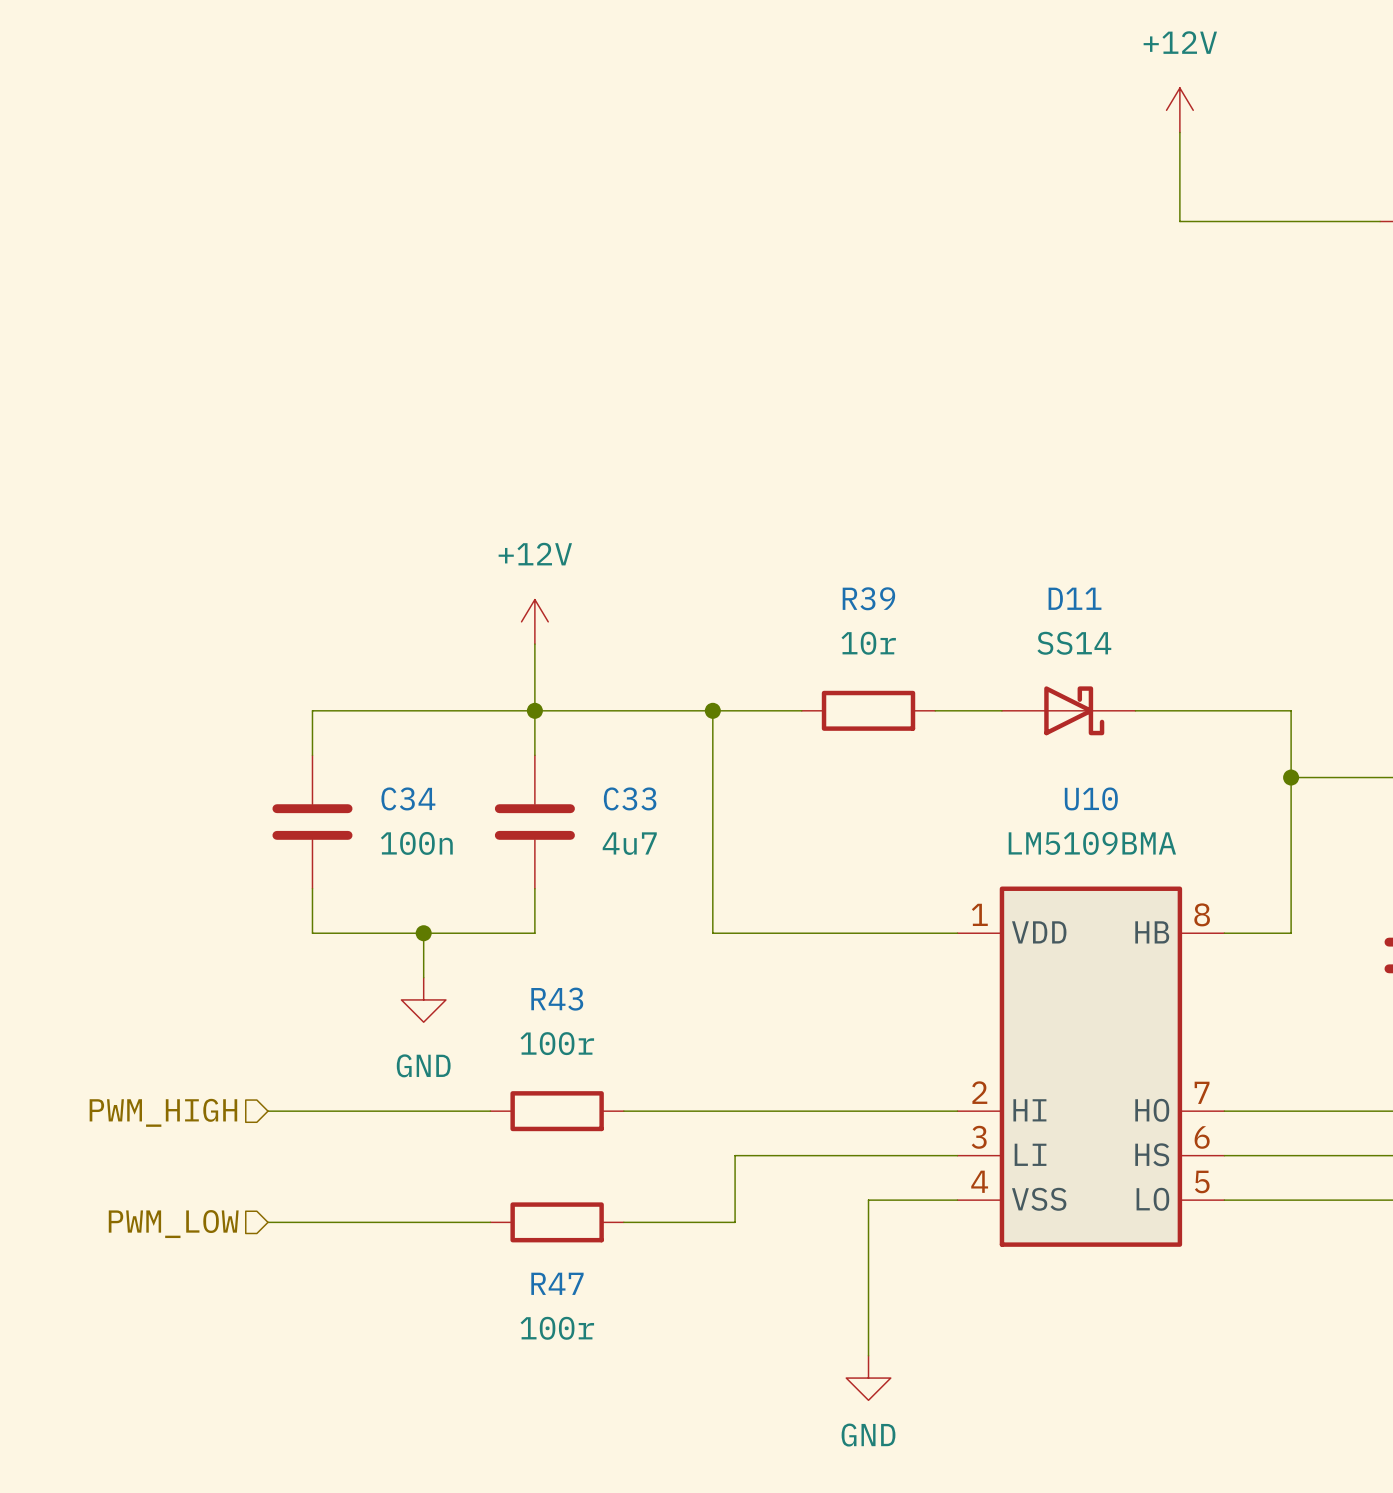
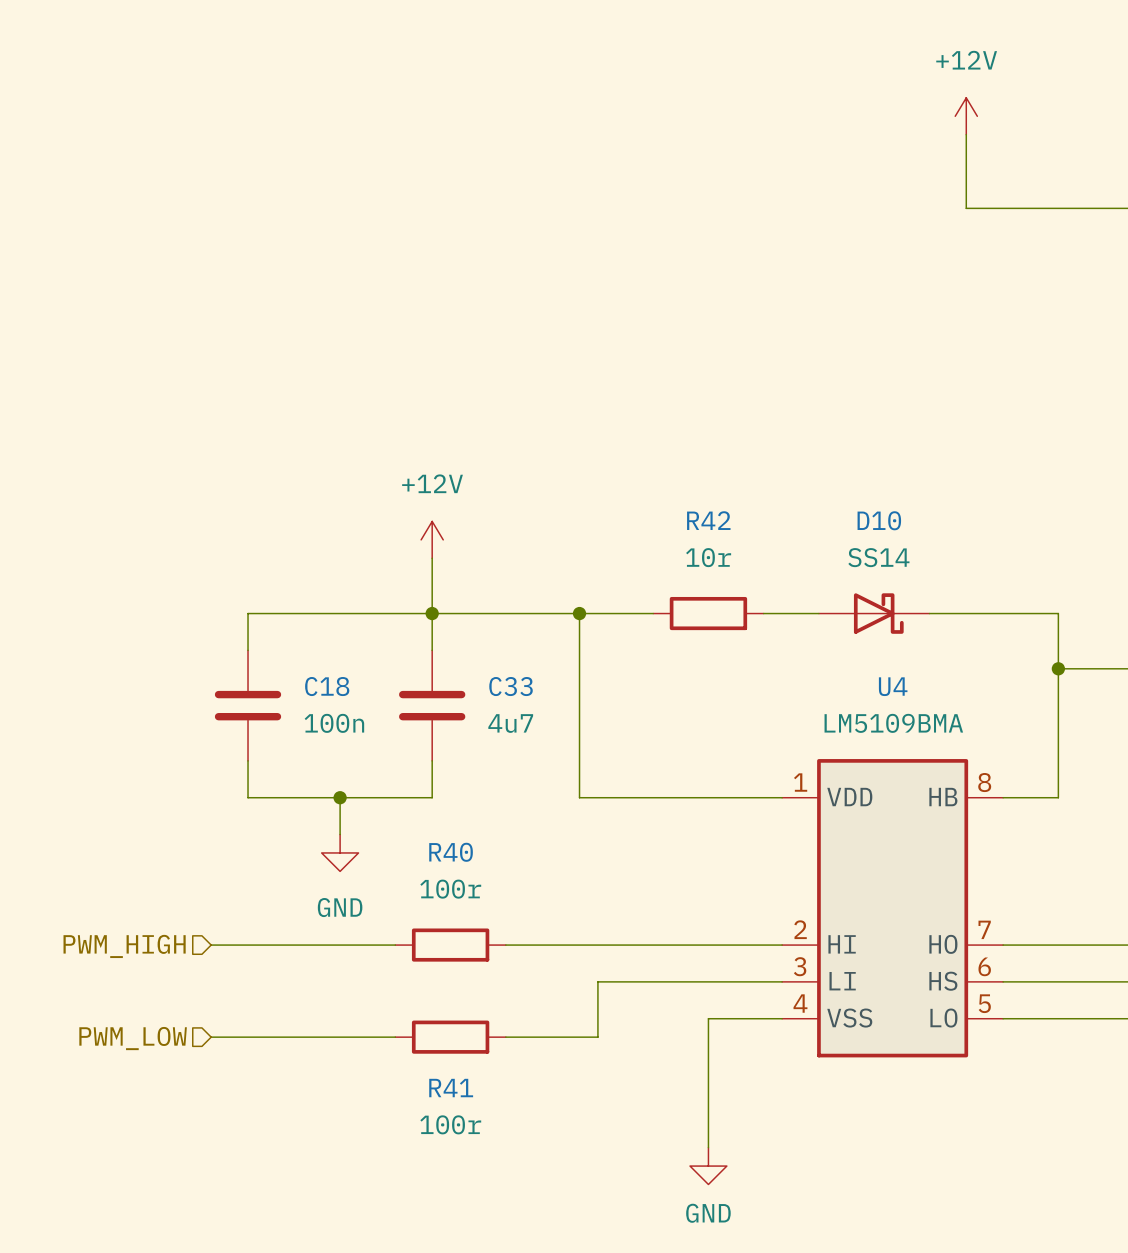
R39 name: R39 (868, 598) -> R42 (708, 520)
D11 name: D11 (1075, 598) -> D10 (879, 520)
C34 name: C34 (408, 798) -> C18 (327, 686)
U10 name: U10 (1091, 798) -> U4 (893, 686)
R43 name: R43 (557, 999) -> R40 (451, 852)
R47 name: R47 (557, 1283) -> R41 (451, 1088)

